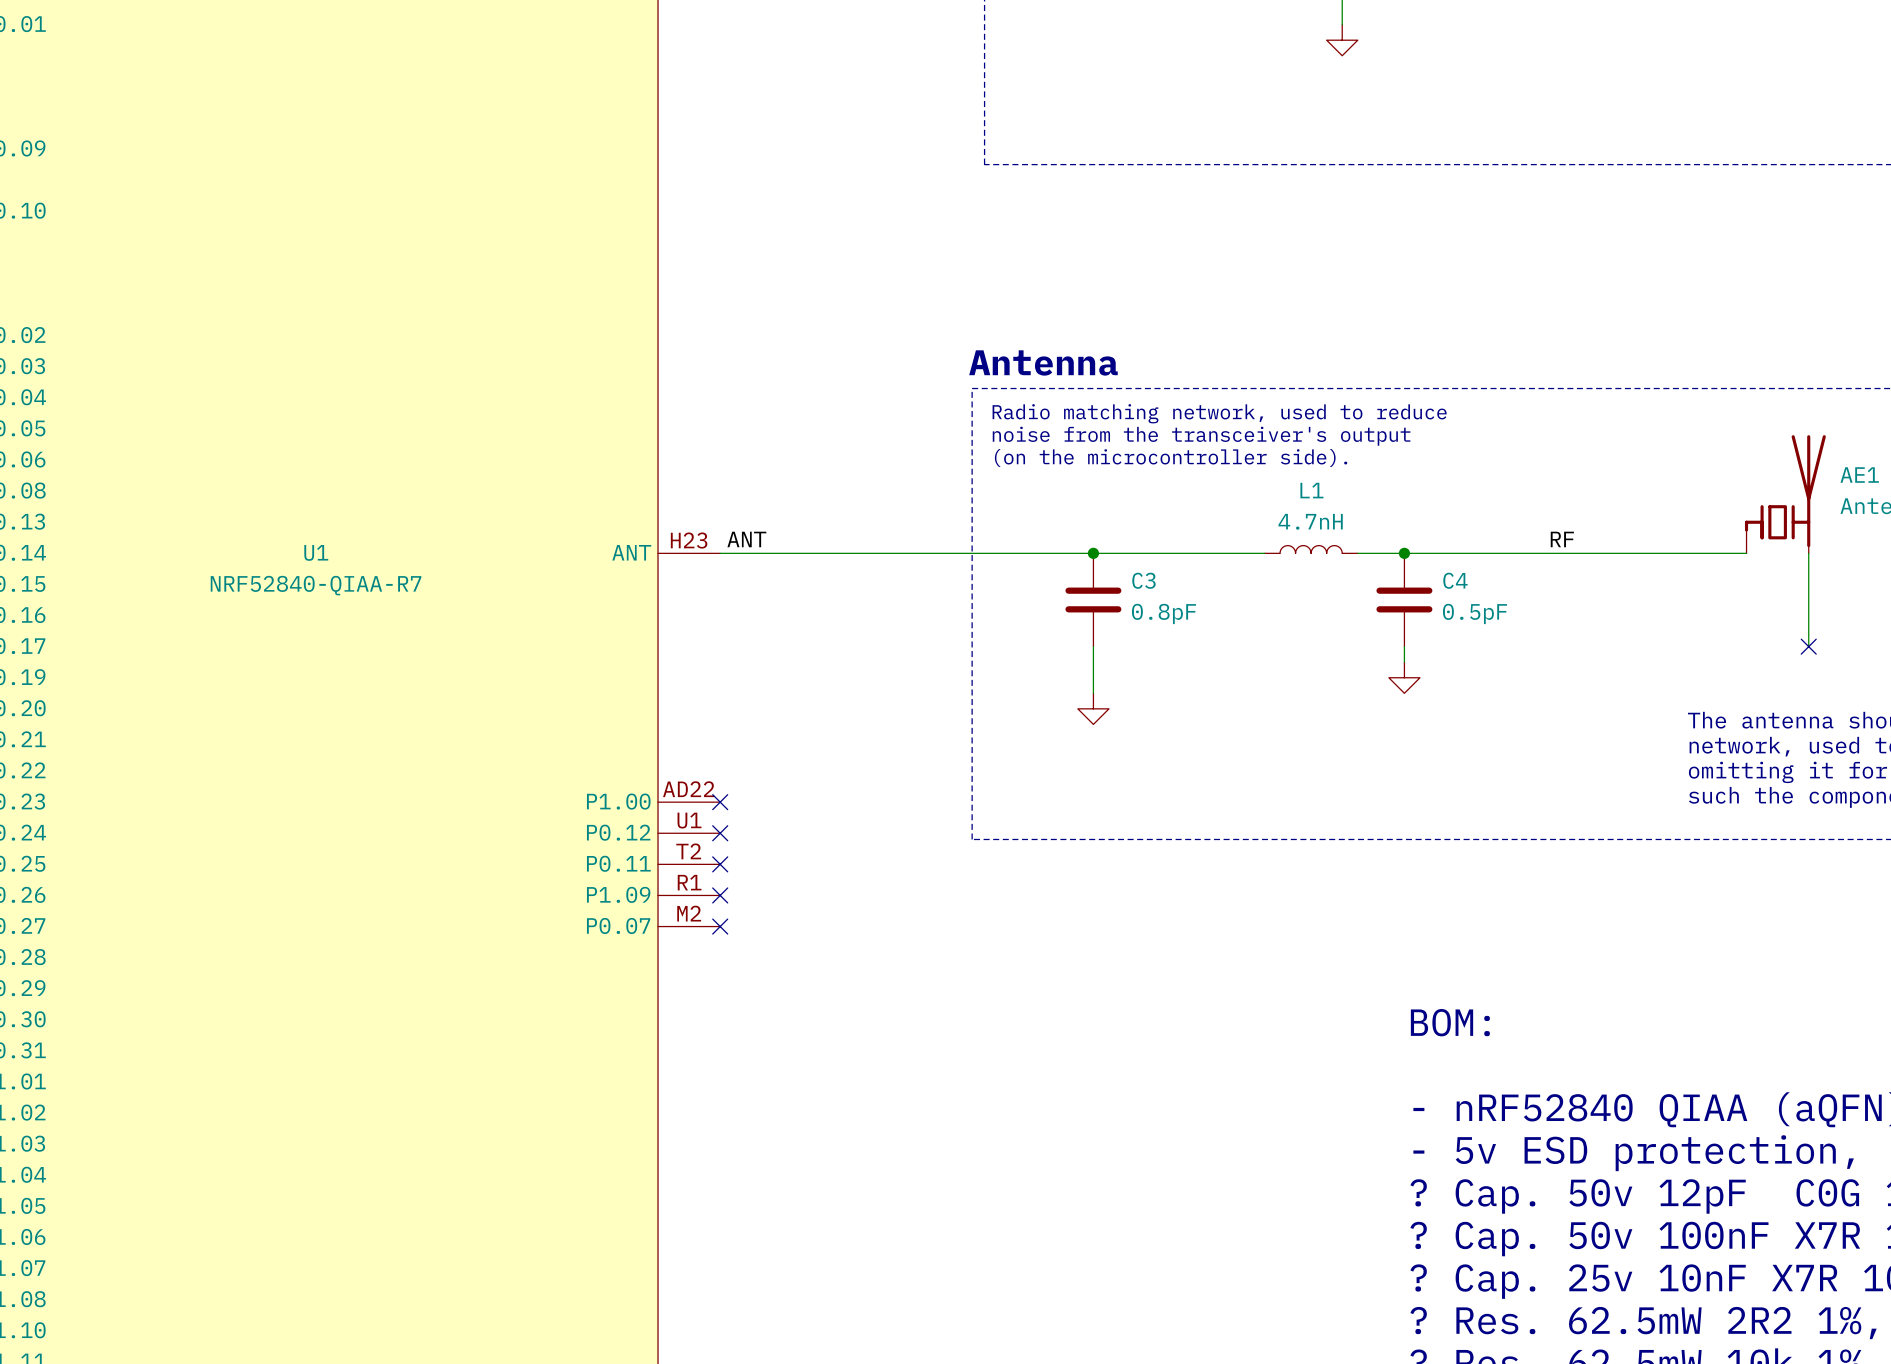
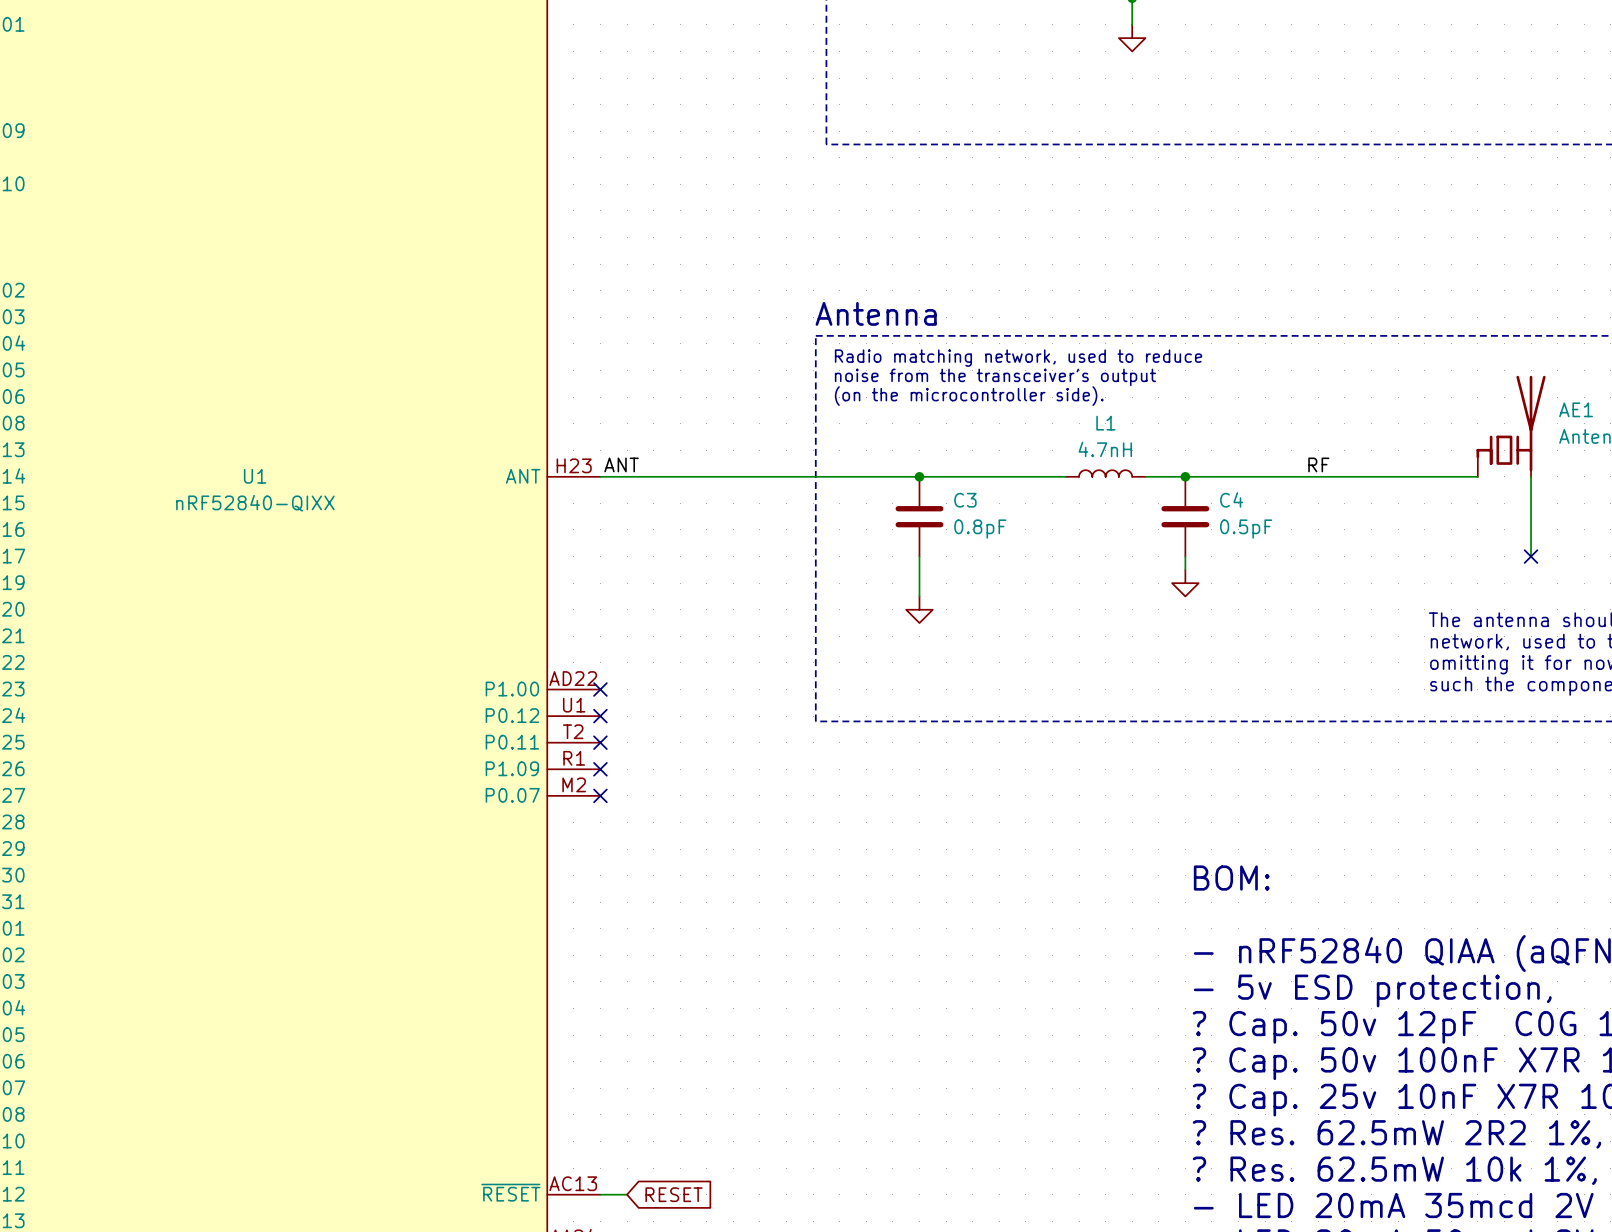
U1 value: NRF52840-QIAA-R7 (316, 585) -> nRF52840-QIXX (255, 503)

